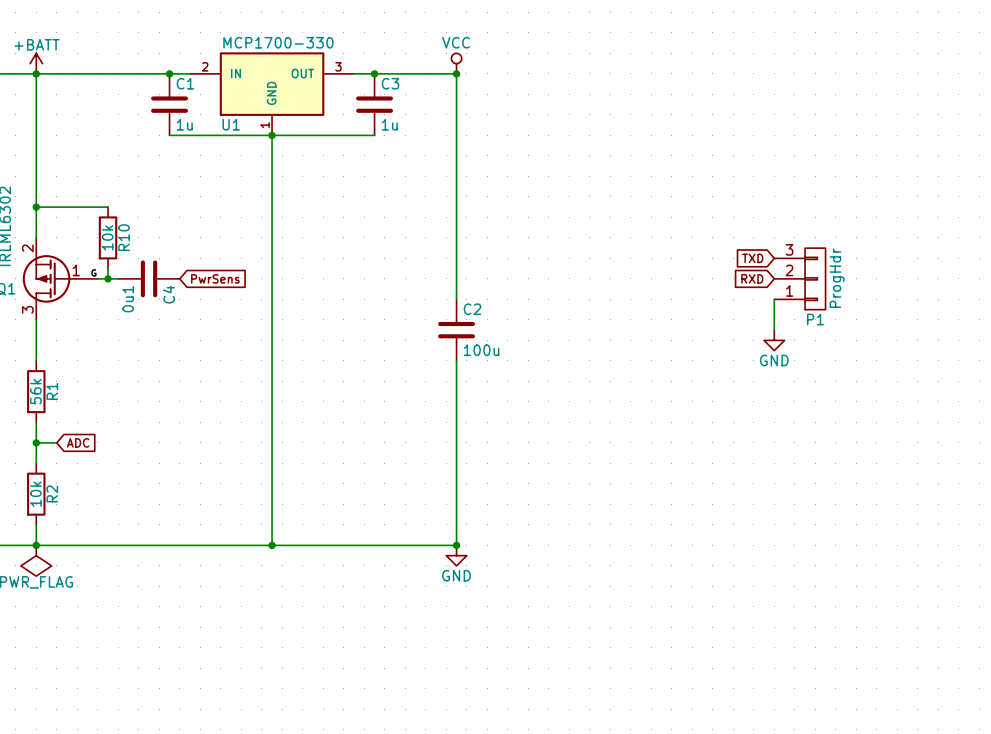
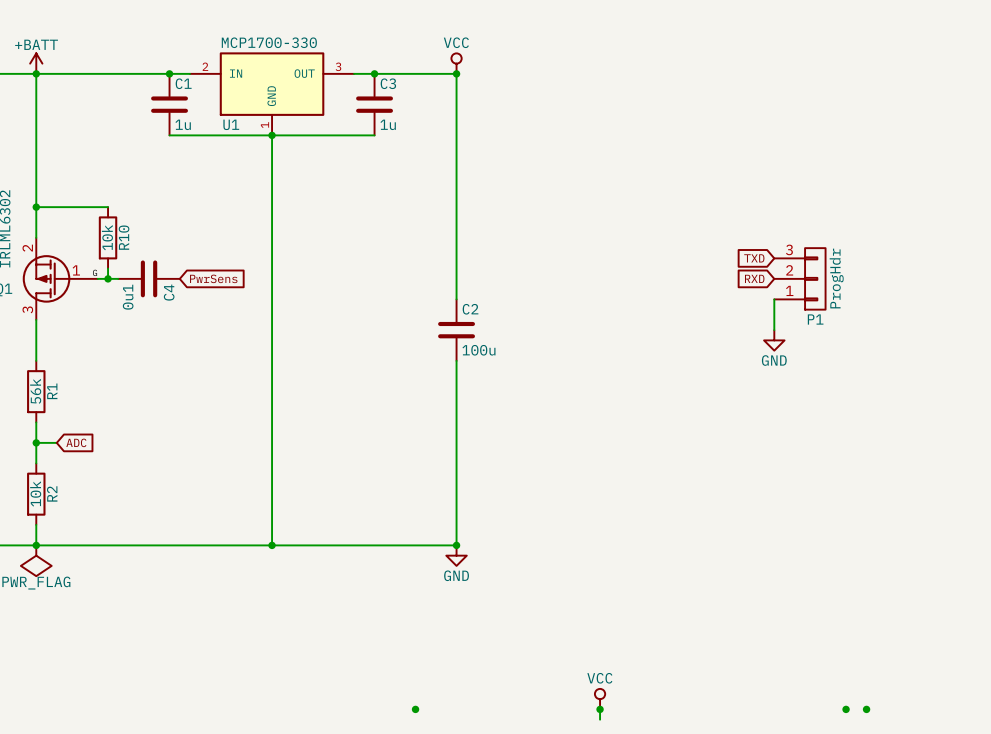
power symbol: none -> VCC (600, 699)
junction: none -> (415, 709)
wire: none -> (600, 709) (600, 719)
junction: none -> (600, 709)
junction: none -> (846, 709)
junction: none -> (866, 709)

